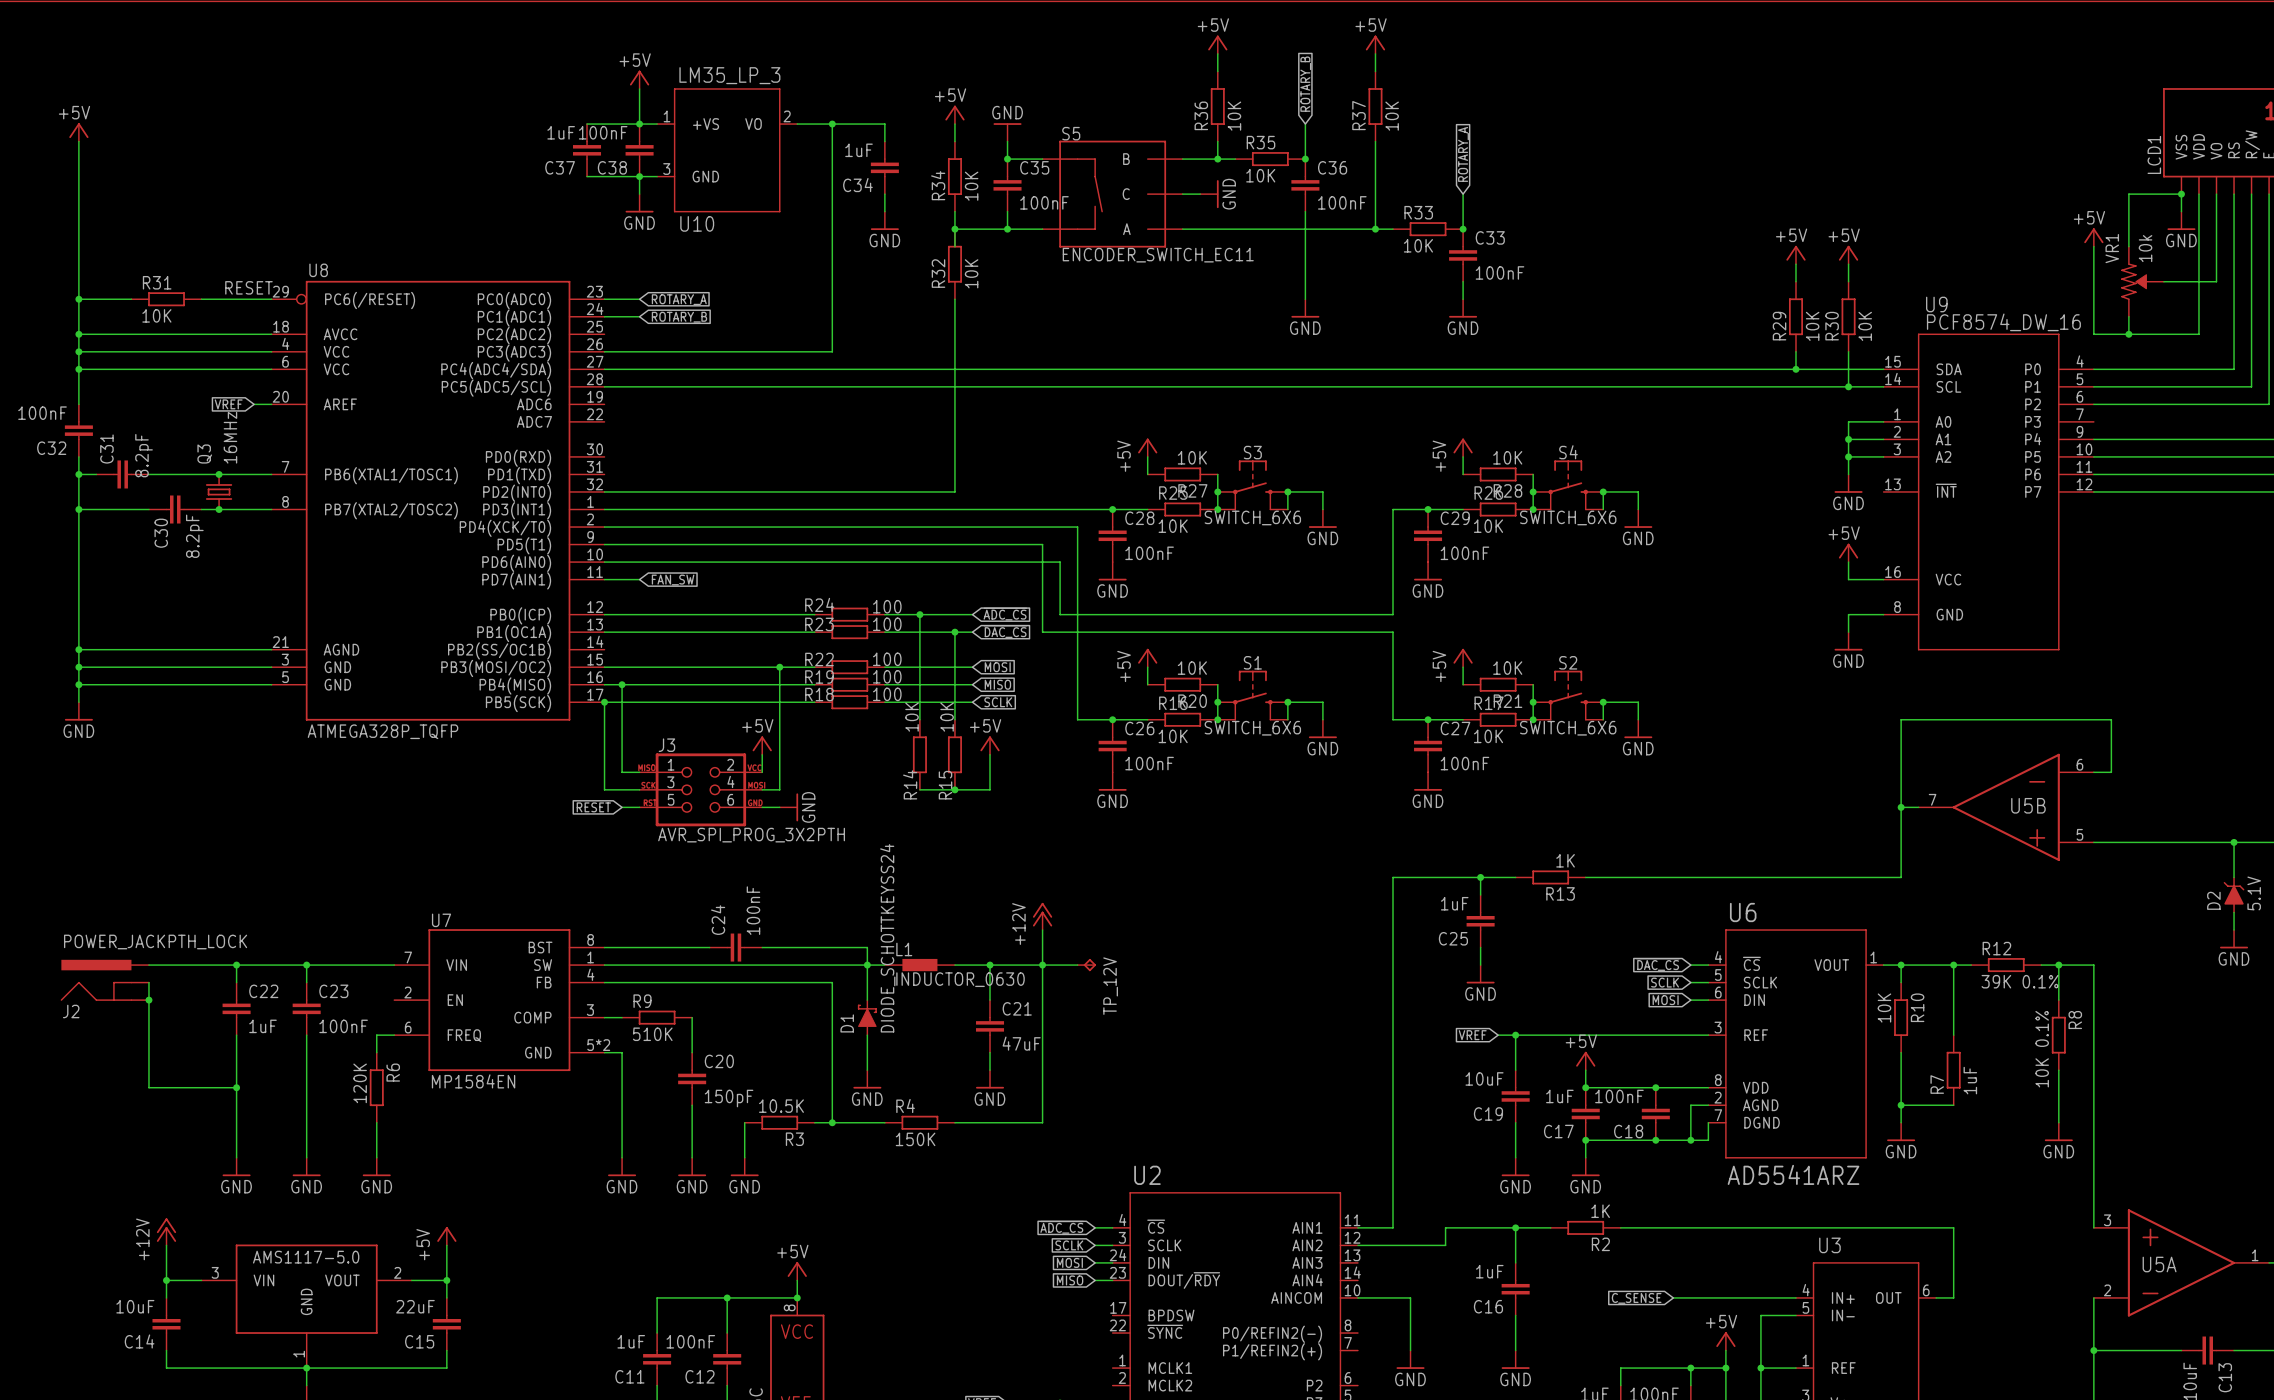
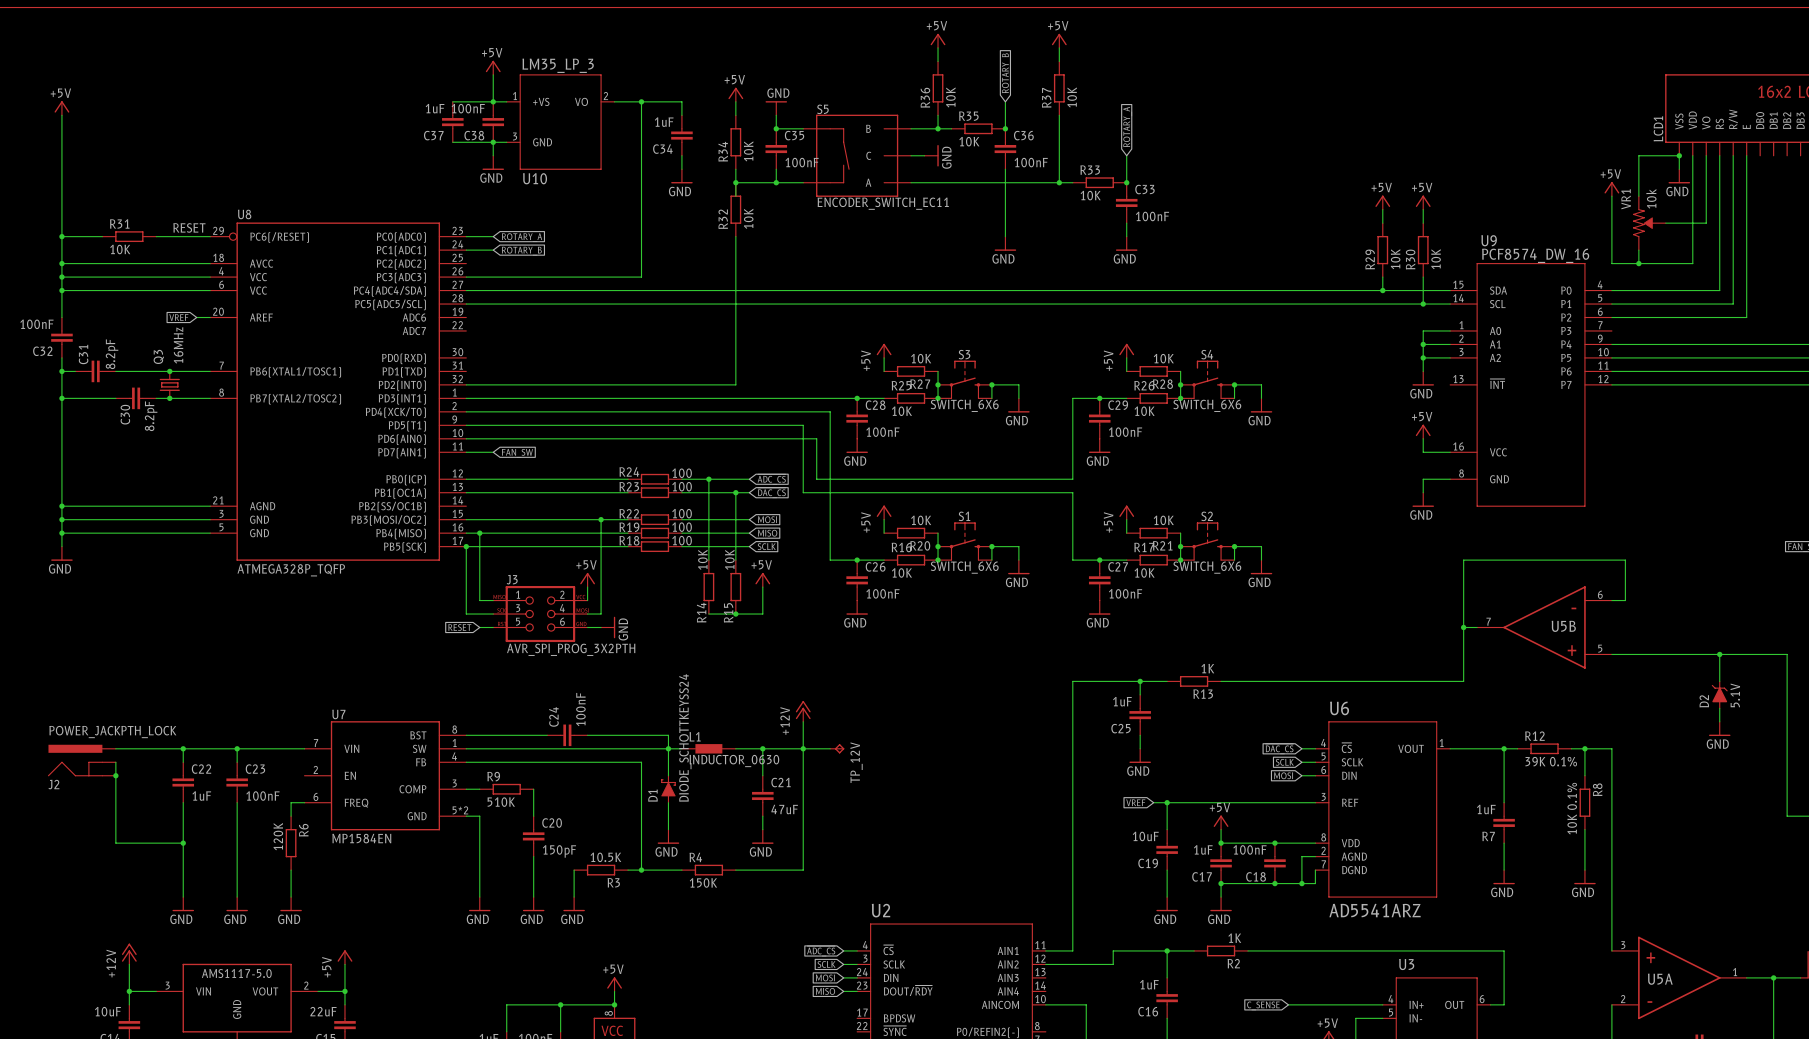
wire: (1901, 965) (1901, 982) -> none
junction: (1901, 965) -> none
R10: 10K (1901, 1017) -> none
R7 symbol: [1946, 1035, 1961, 1106] -> [1493, 802, 1515, 844]
wire: (1901, 1052) (1901, 1122) -> none
R7 value position: 1uF (1970, 1080) -> 1uF (1486, 809)
wire: none -> (1504, 843) (1504, 870)
wire: (1901, 1105) (1953, 1105) -> none
junction: (1901, 1105) -> none
power symbol position: GND (1901, 1131) -> GND (1504, 877)

